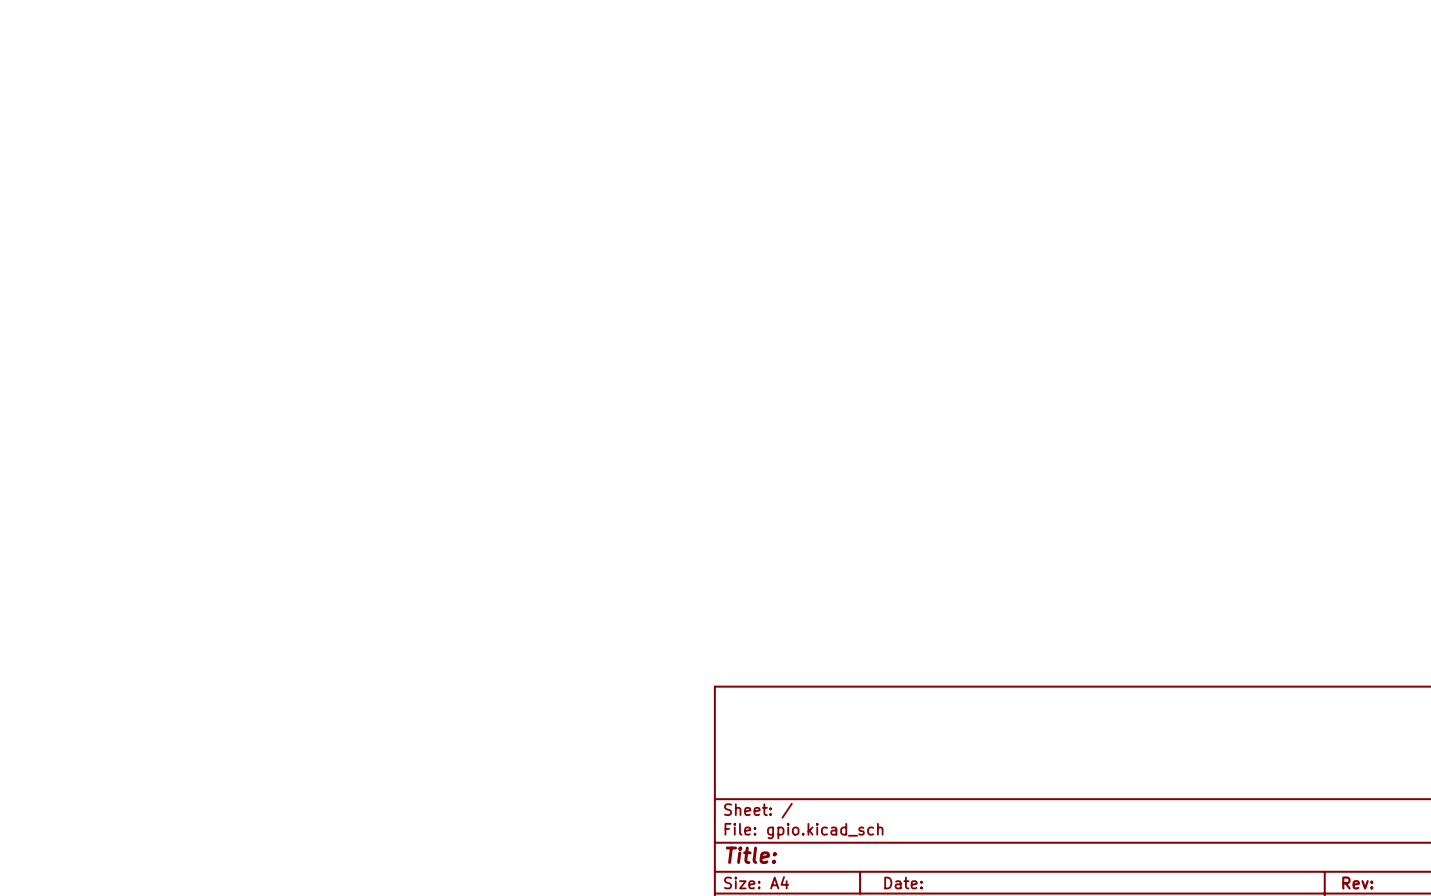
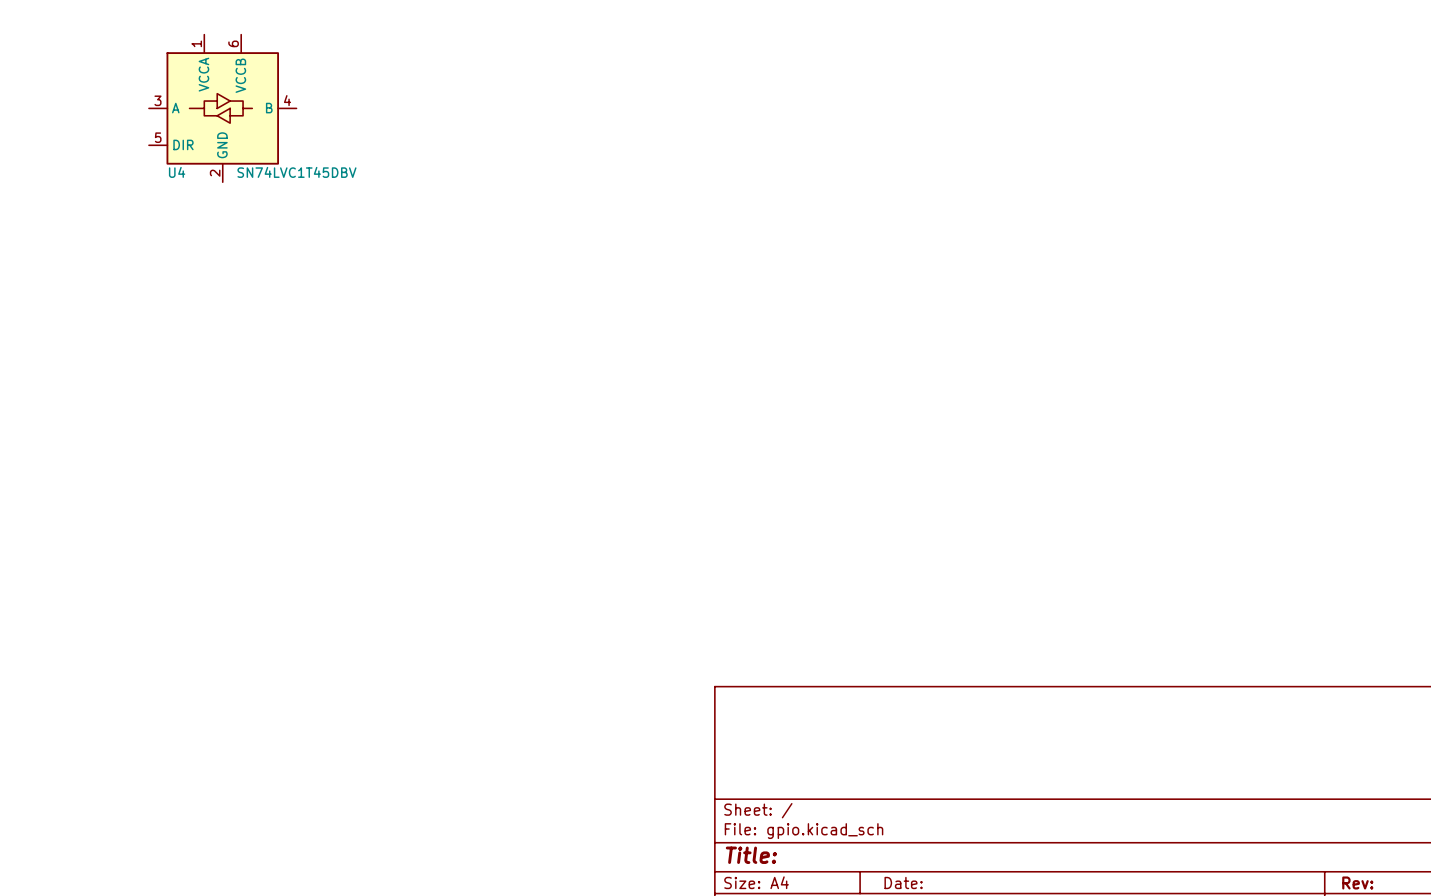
U4: none -> SN74LVC1T45DBV (222, 108)

